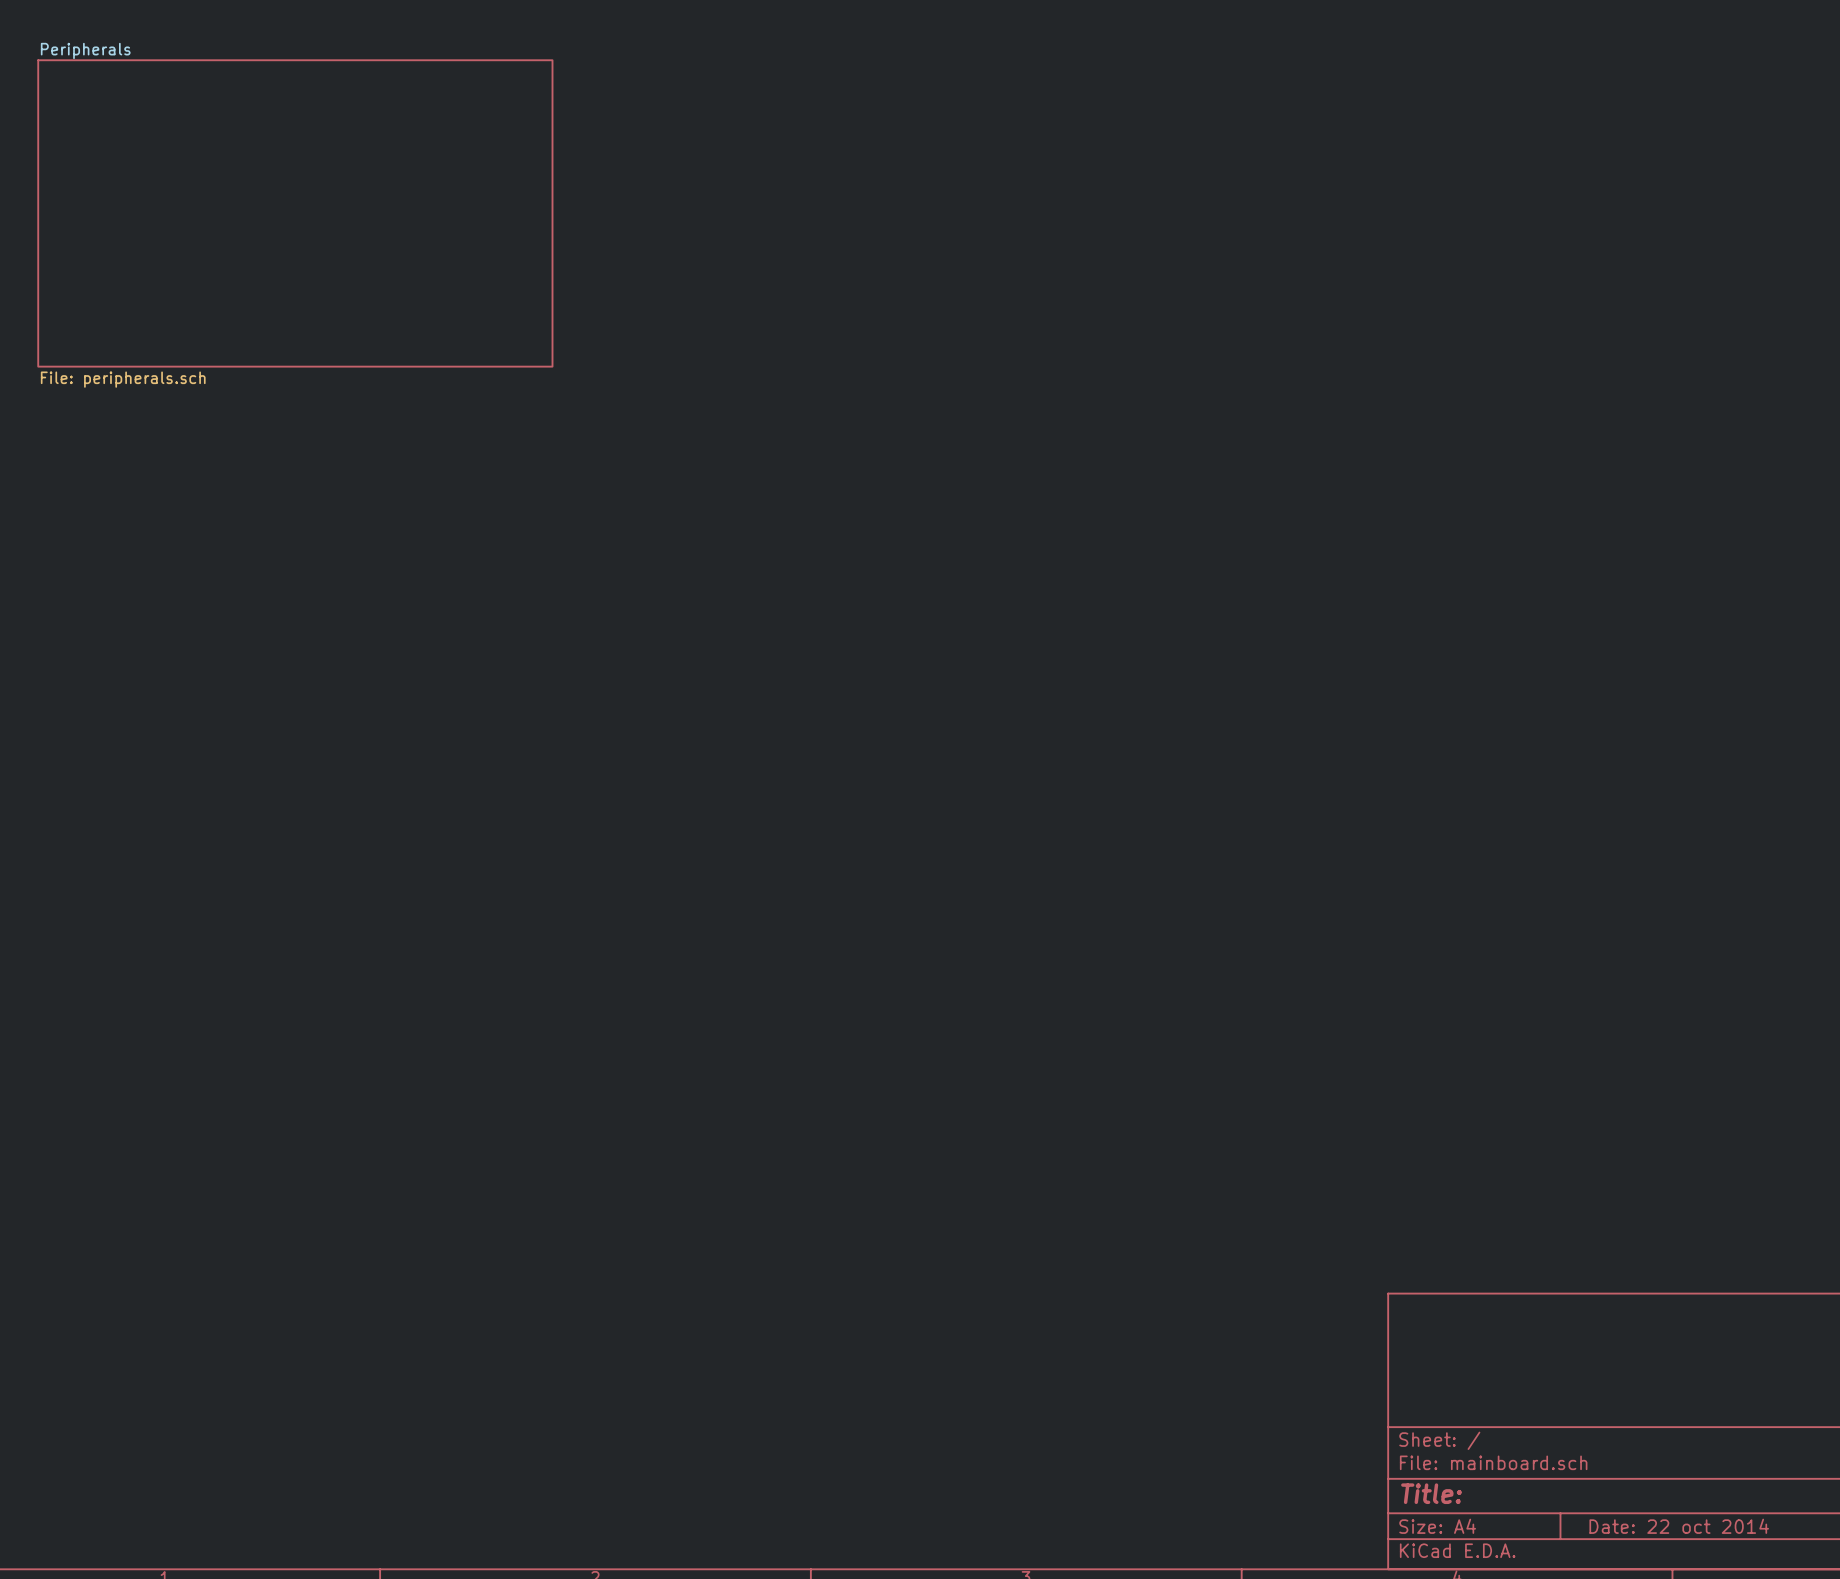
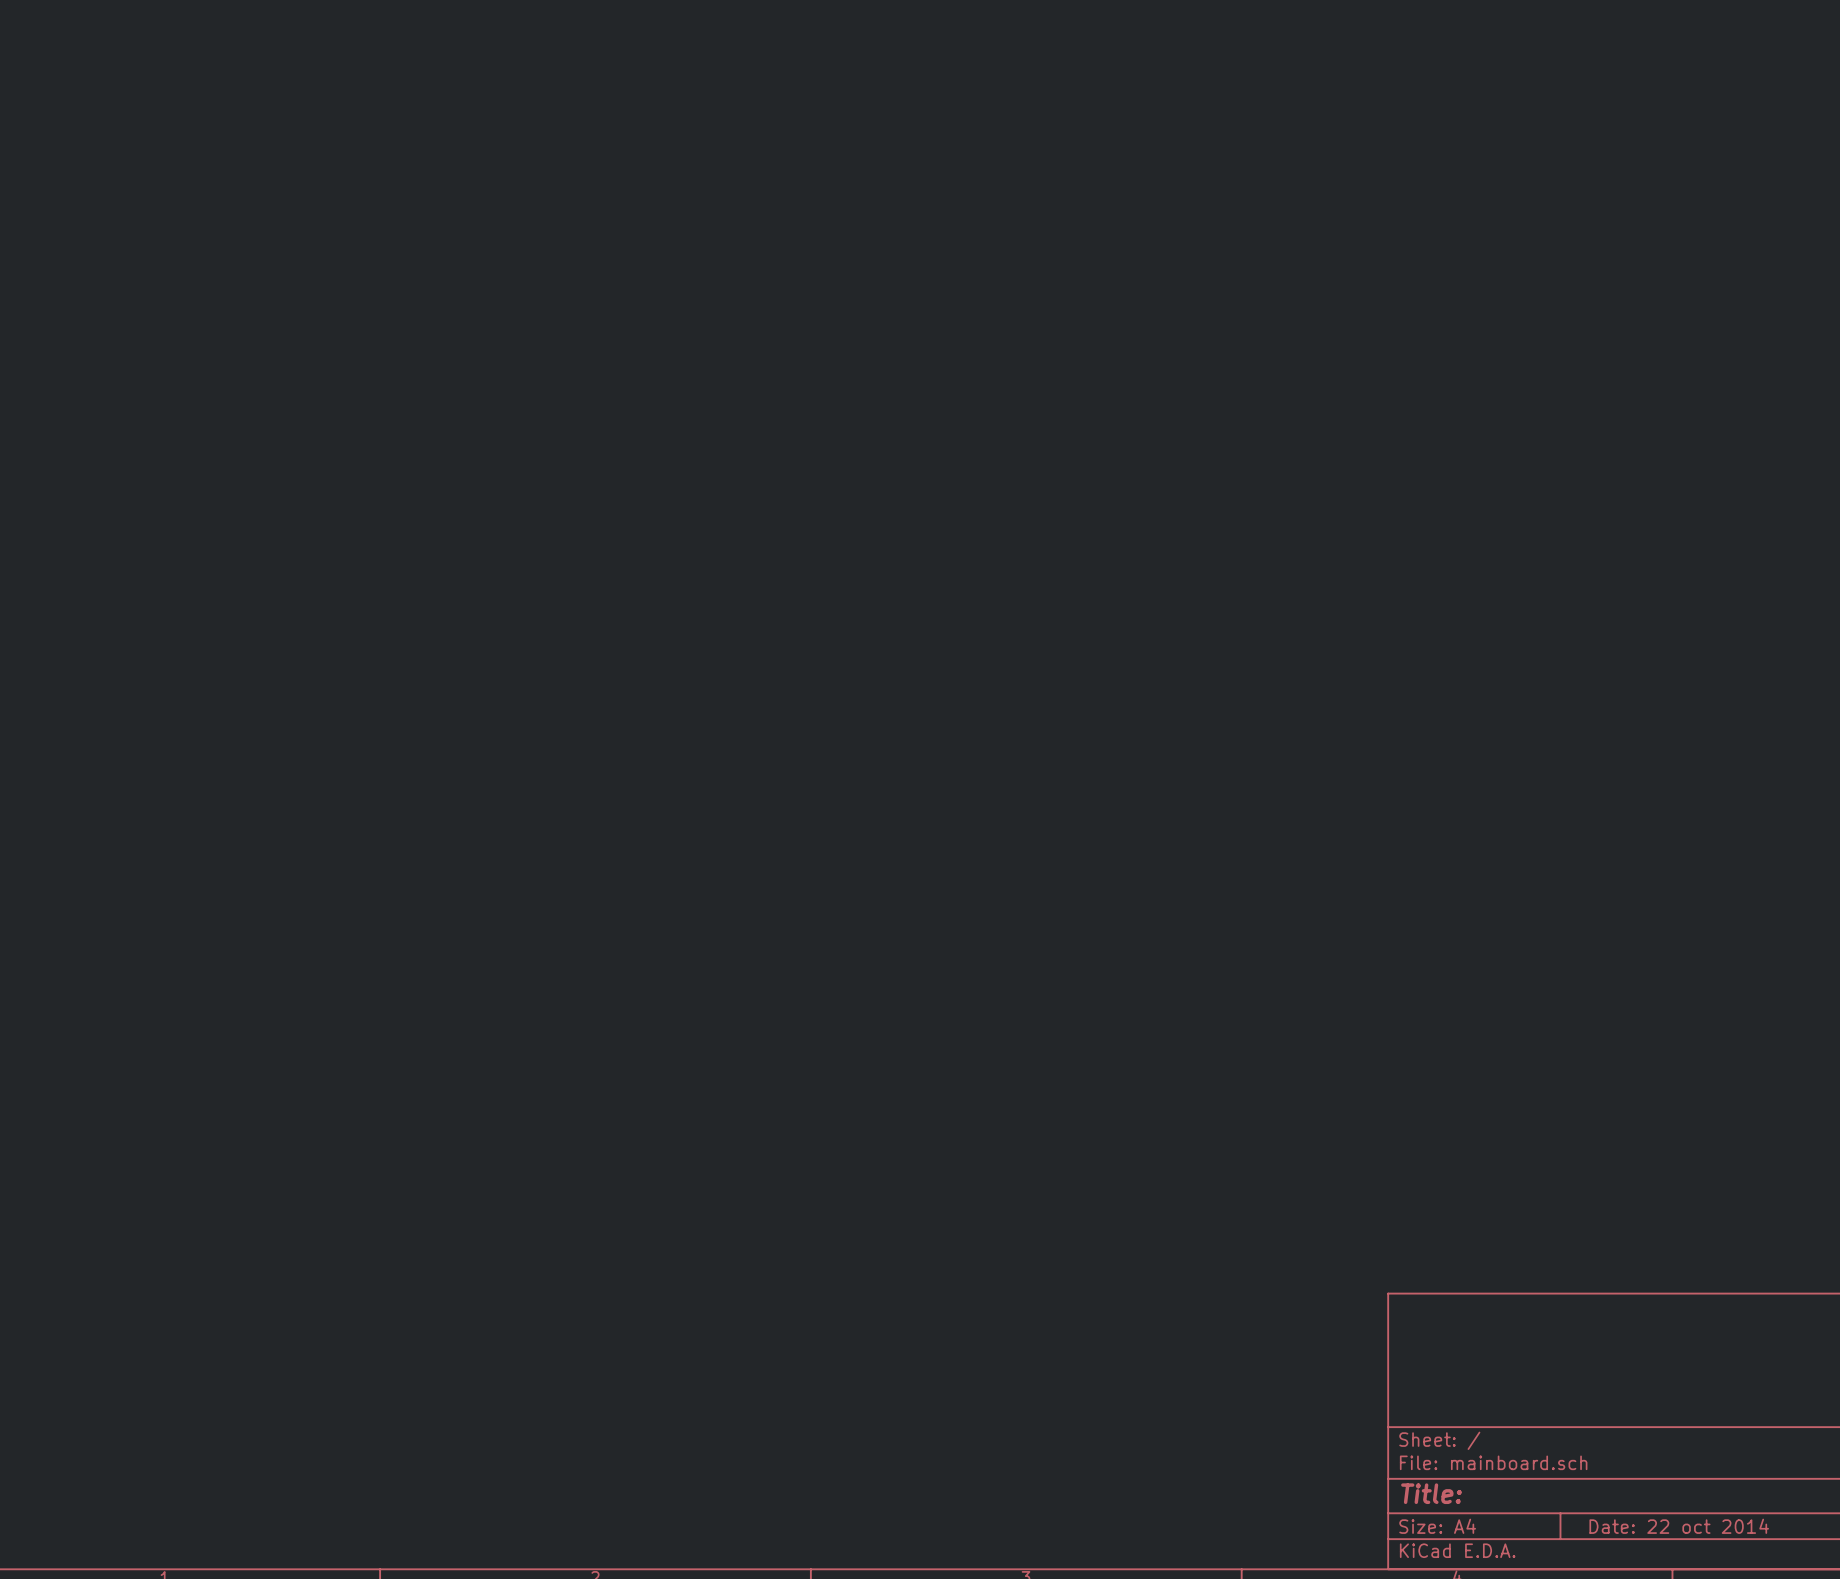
sheet Peripherals: File: peripherals.sch (295, 213) -> none

